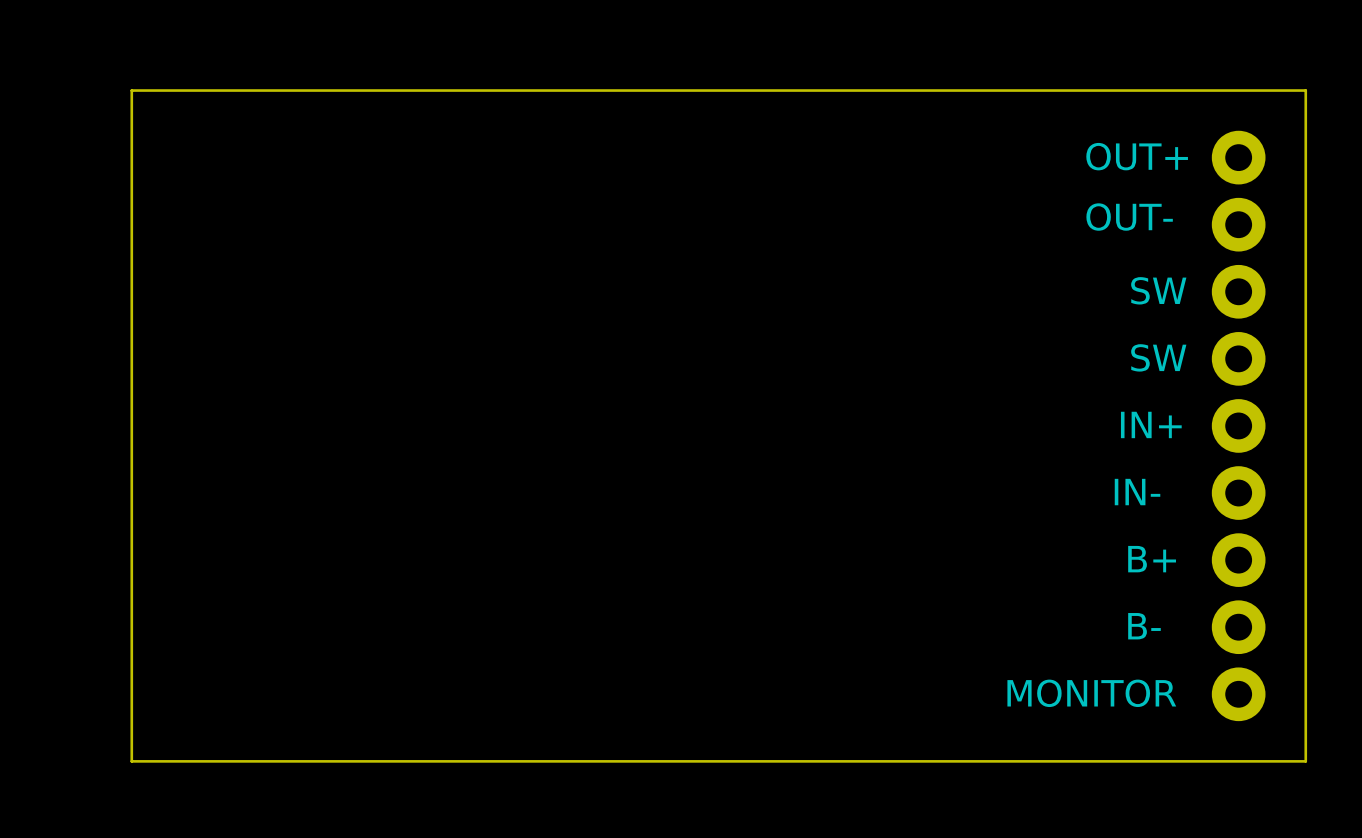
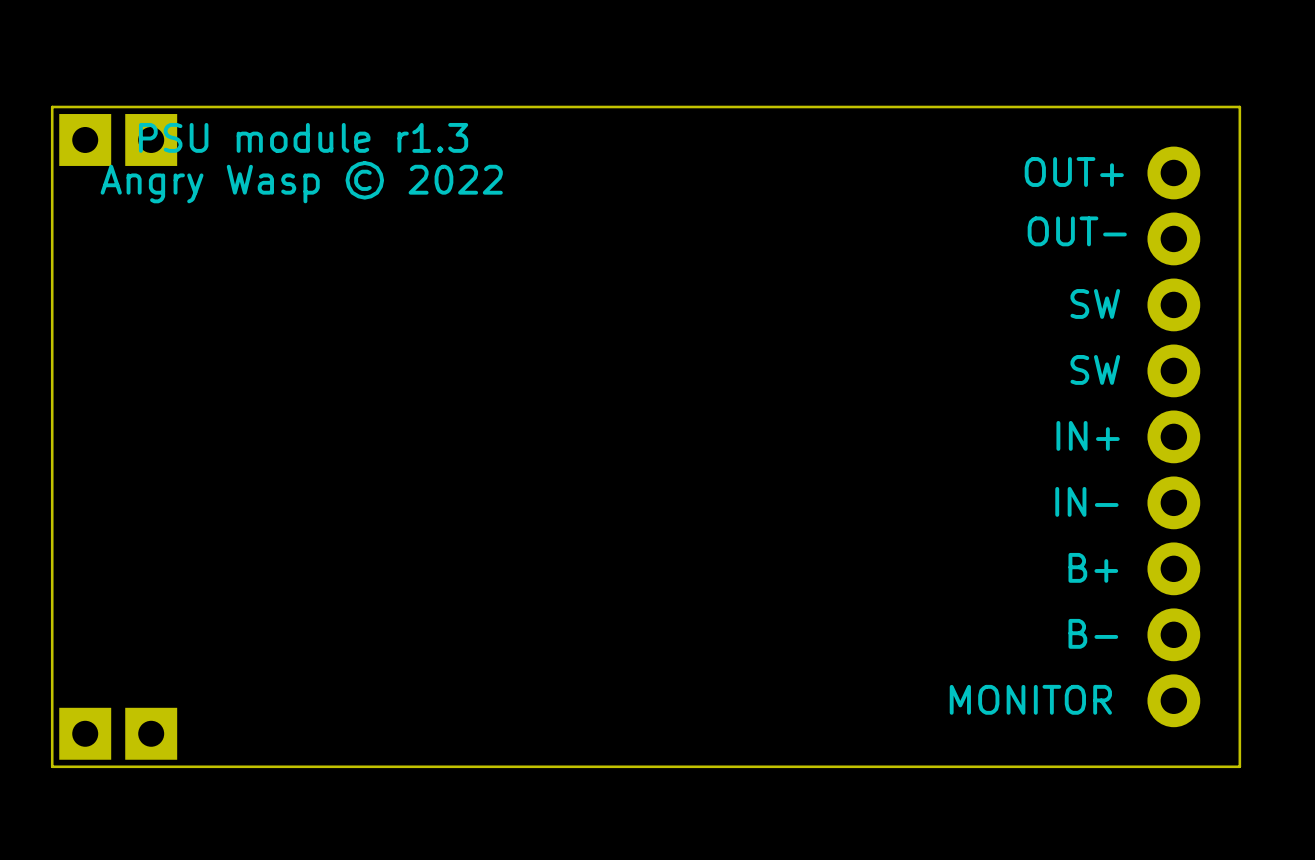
board edge: (131, 90) (131, 761) -> (85, 106) (52, 106) (52, 766) (85, 766)
text: none -> PSU module r1.3 (303, 137)
part: none -> (85, 139)
part: none -> (151, 139)
text: none -> Angry Wasp © 2022 (301, 182)
part: none -> (85, 733)
part: none -> (151, 733)

